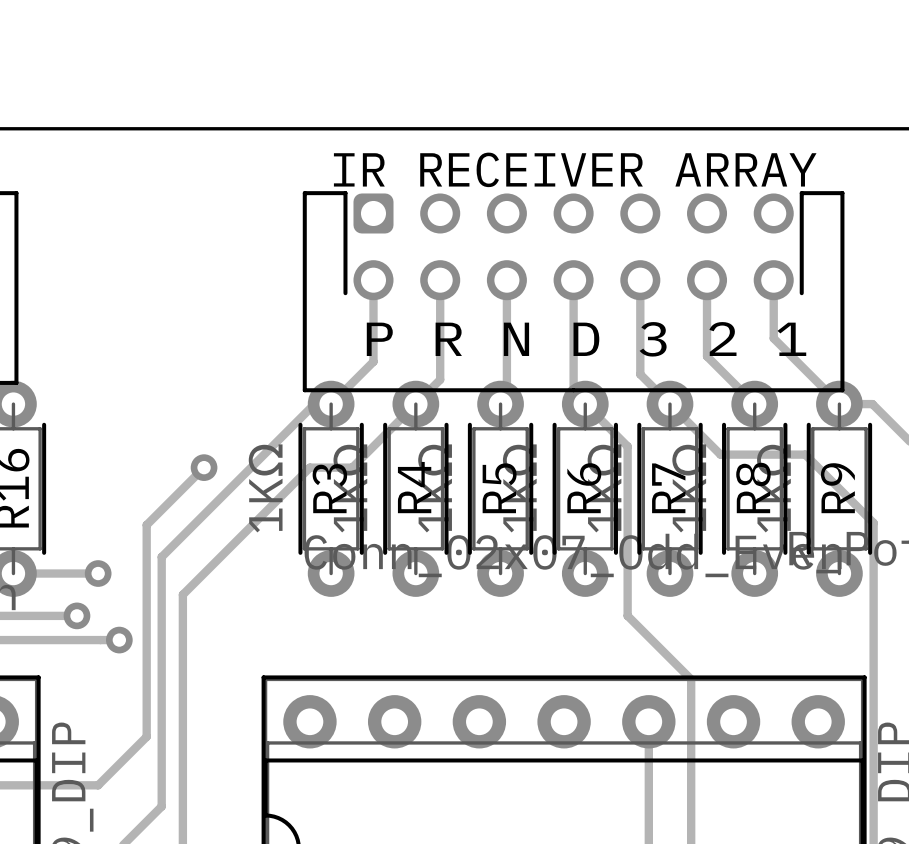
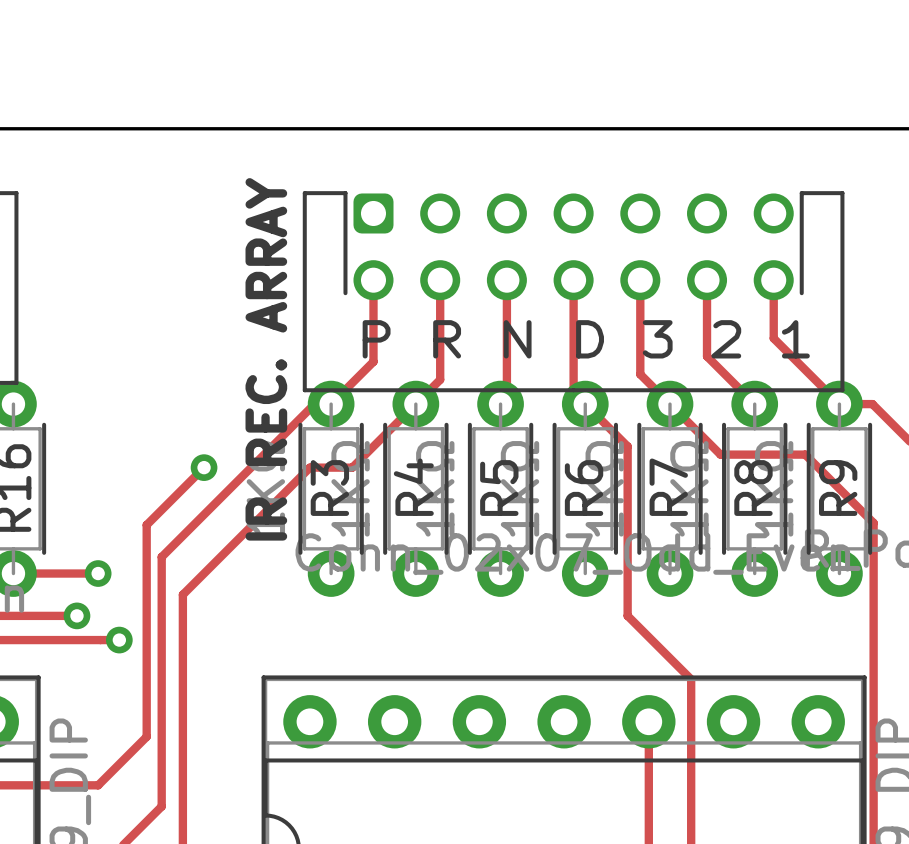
IR RECEIVER ARRAY name: IR RECEIVER ARRAY (575, 169) -> IR REC. ARRAY (266, 359)

